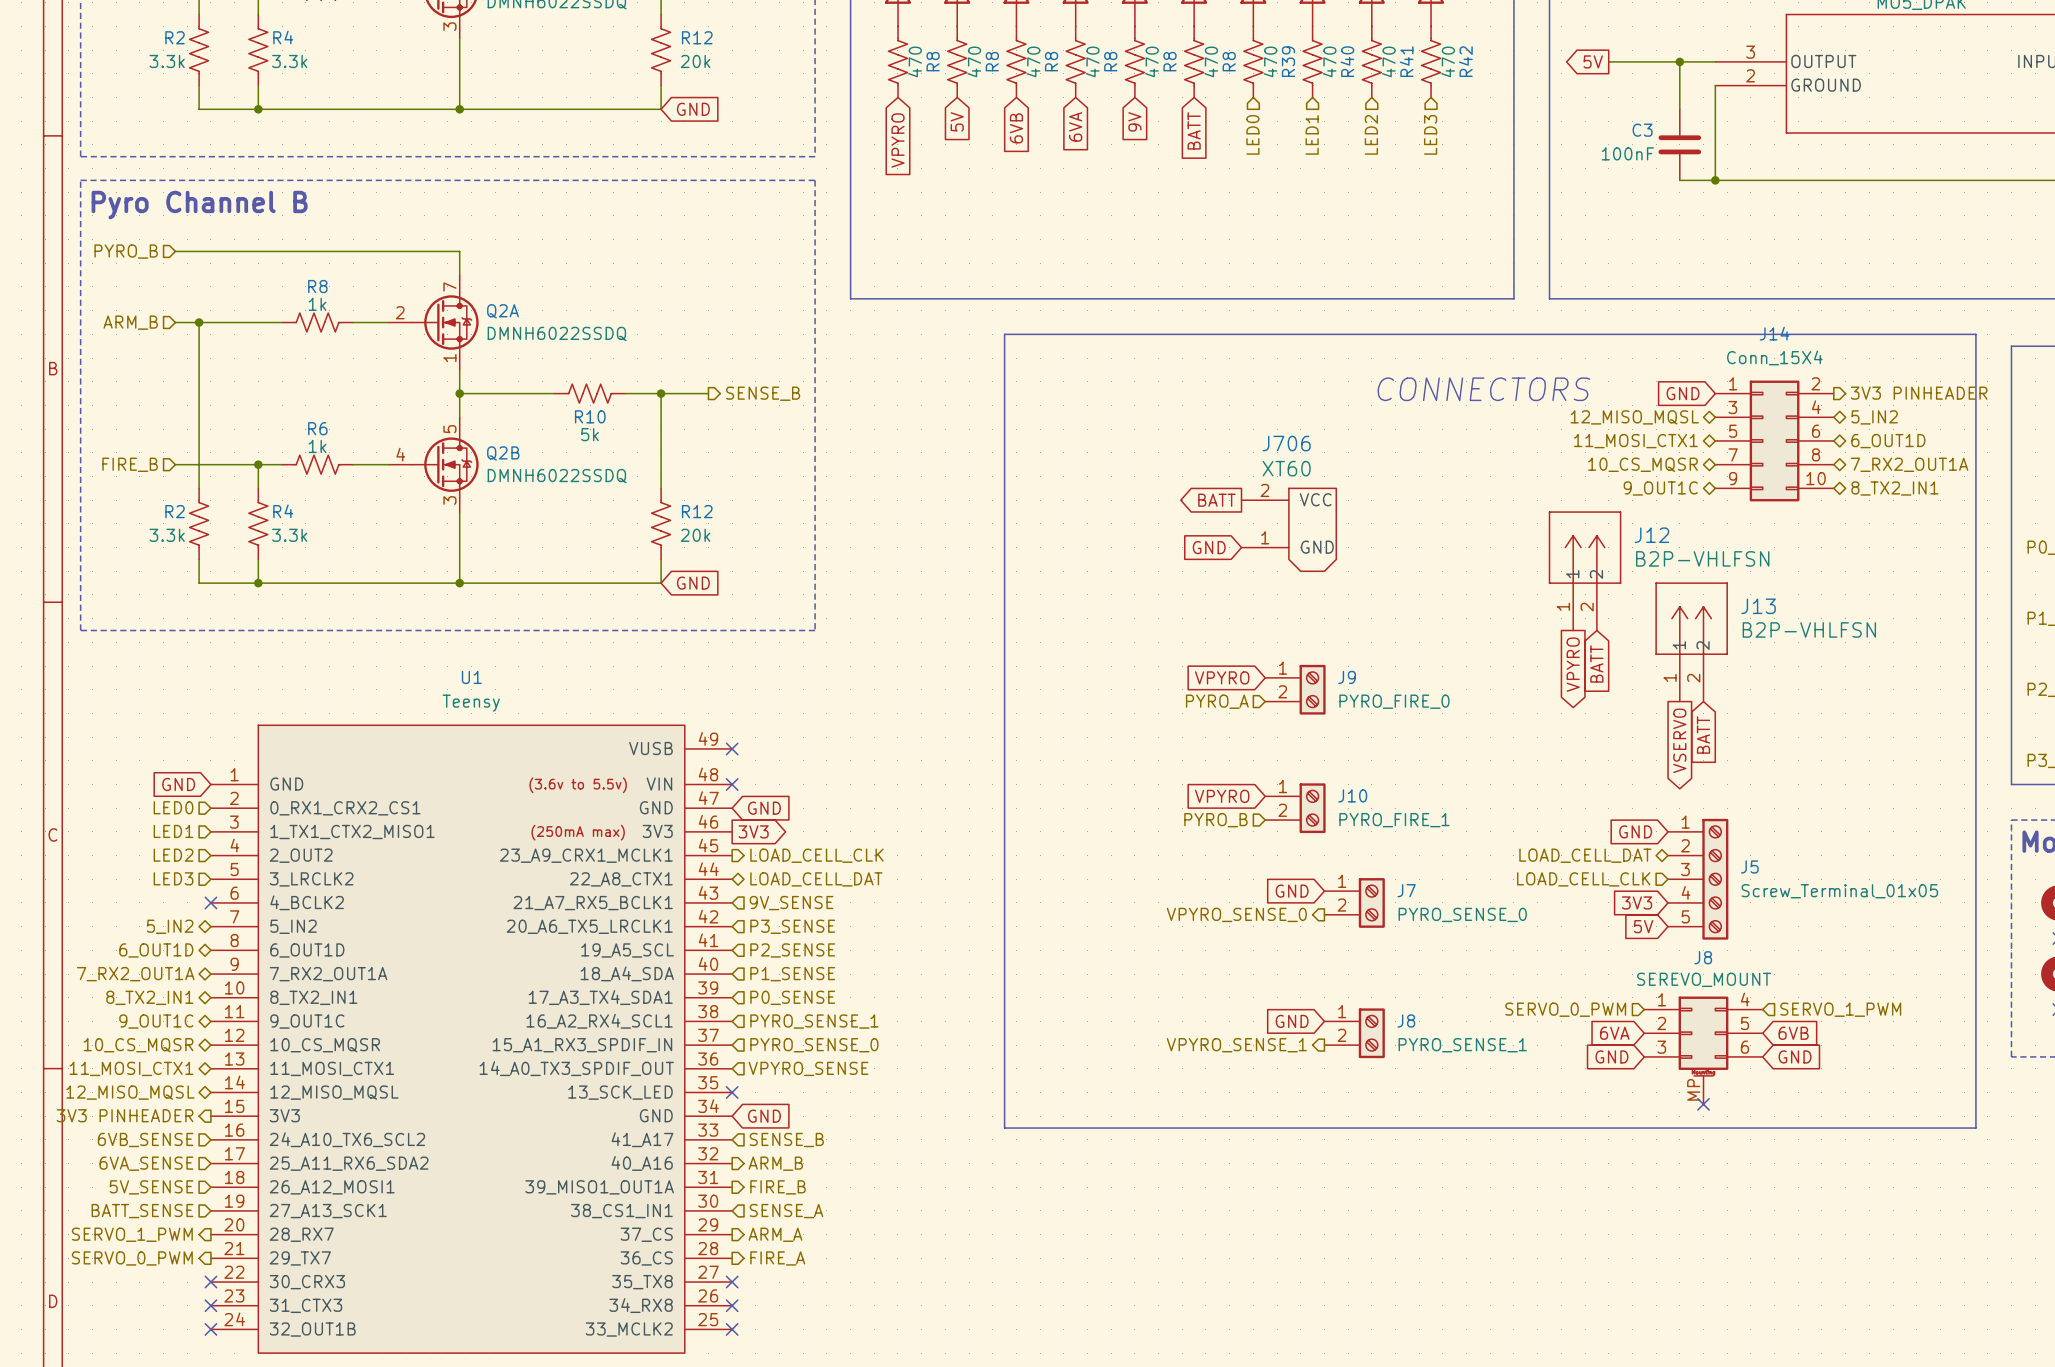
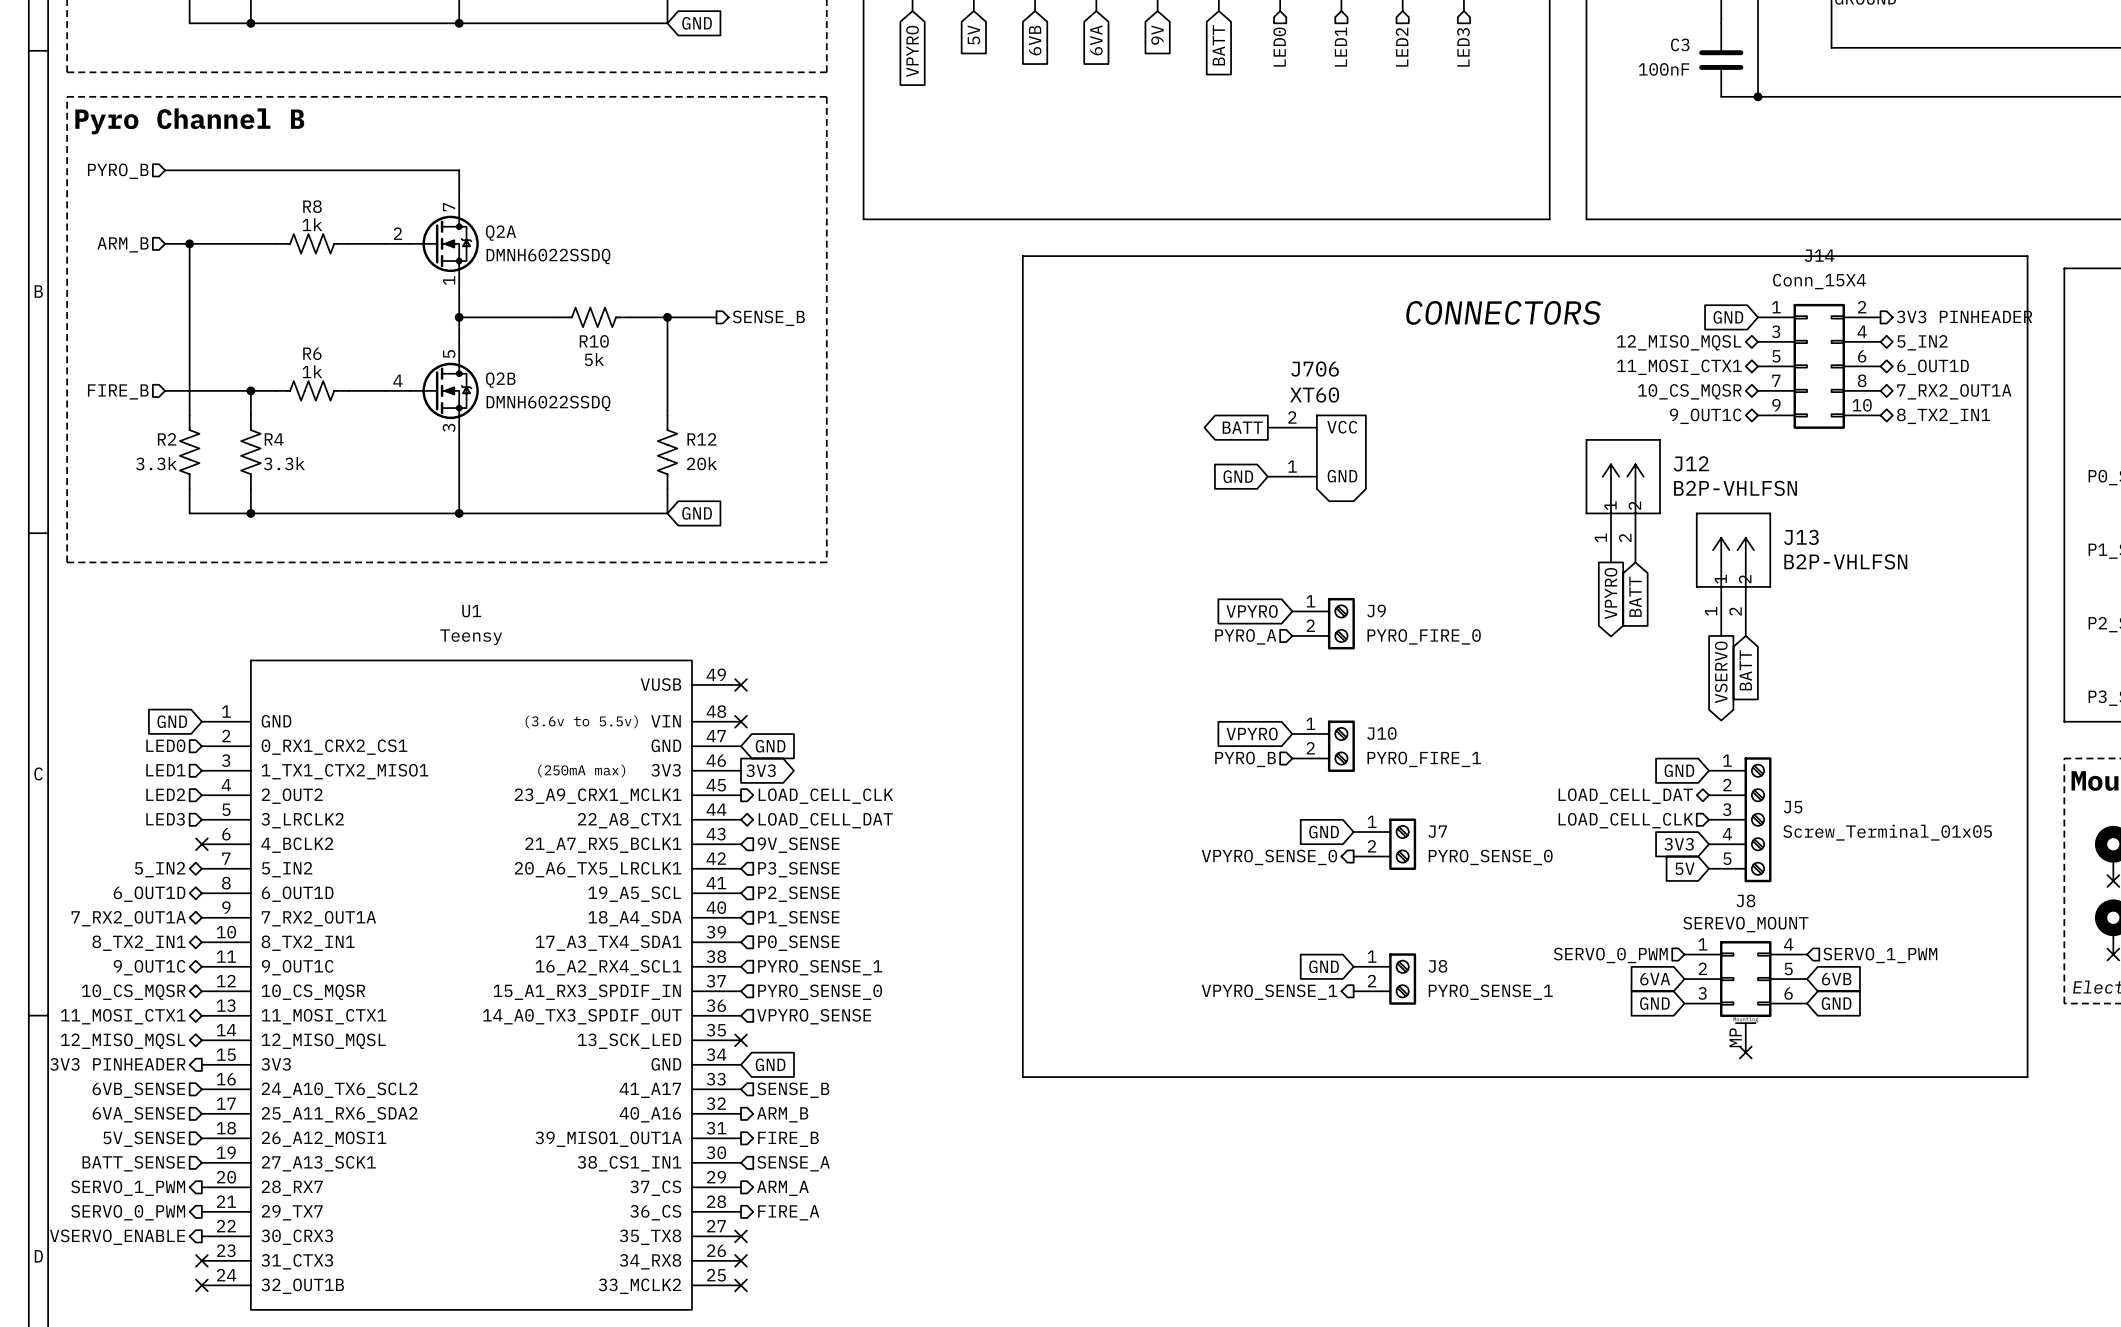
hierarchical label: none -> VSERVO_ENABLE (117, 1237)
no-connect mark: (210, 1282) -> none

